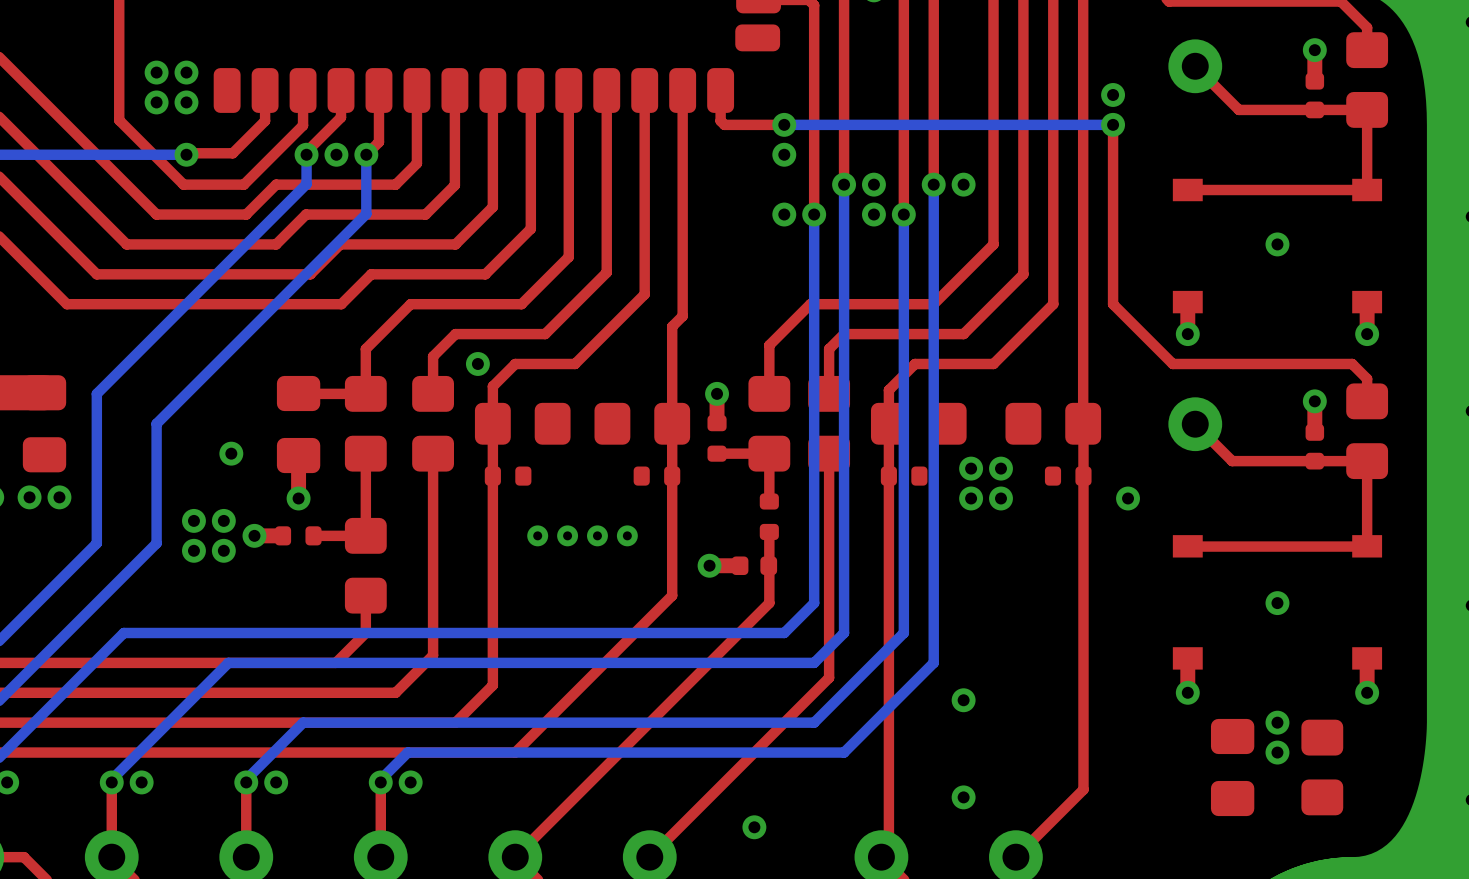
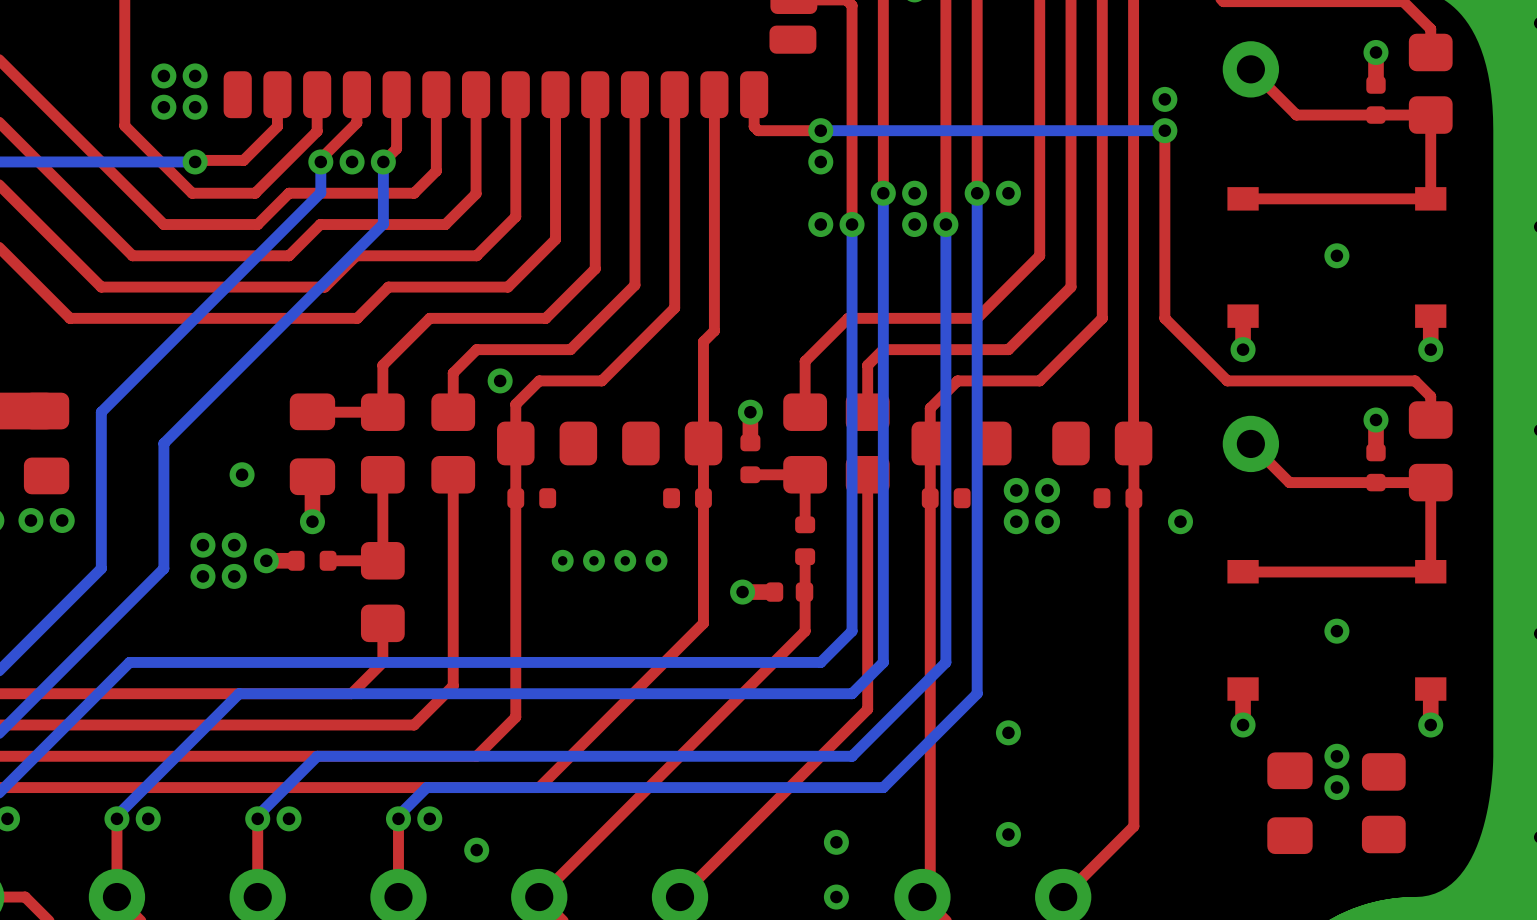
via: none -> (836, 842)
via: none -> (476, 850)
via: (754, 827) -> none
via: none -> (836, 897)

